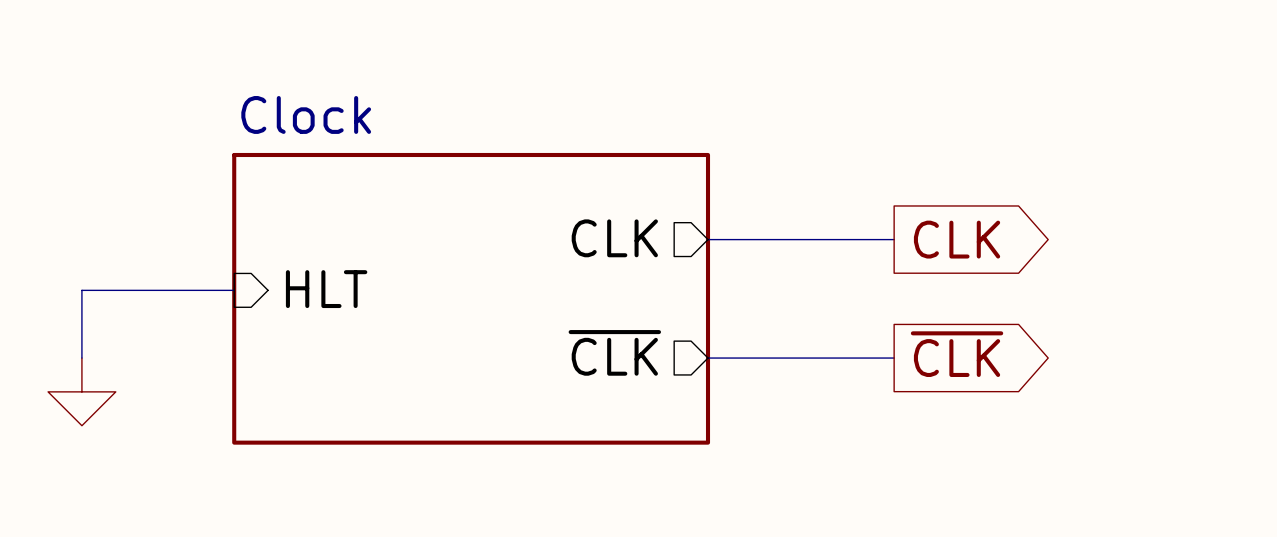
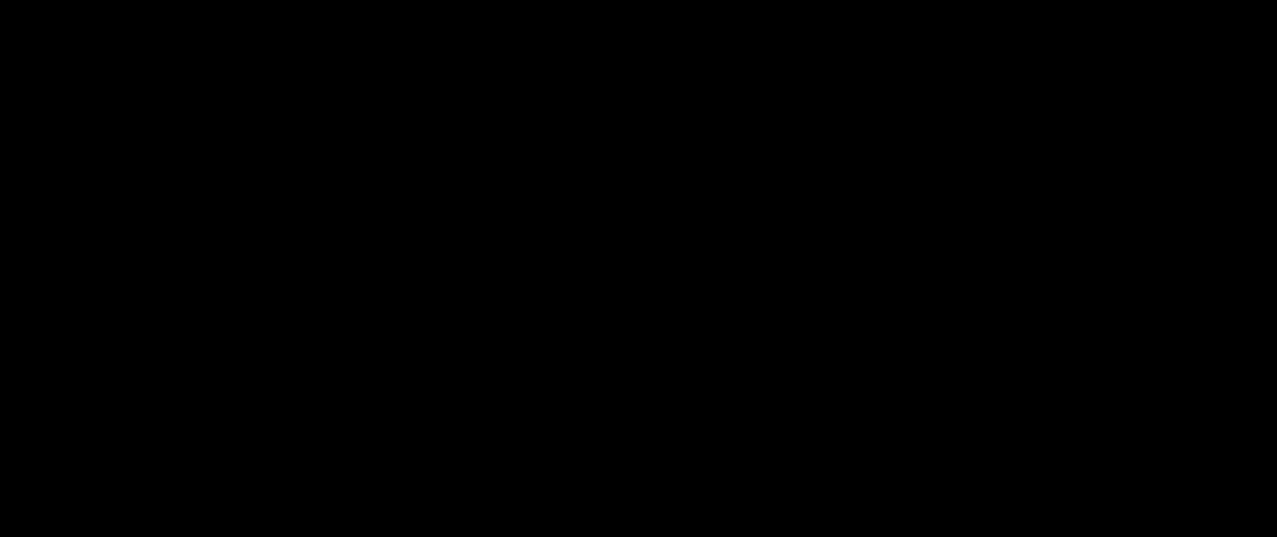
sheet pin: CLK (614, 238) -> none
wire: (708, 239) (894, 239) -> none
global label: CLK (957, 239) -> none
sheet pin: HLT (326, 289) -> none
wire: (234, 290) (81, 290) (81, 358) -> none
sheet Clock: (471, 298) -> none
sheet pin: ~{CLK} (614, 352) -> none
global label: ~{CLK} (957, 354) -> none
wire: (708, 358) (894, 358) -> none
power symbol: (81, 391) -> none

